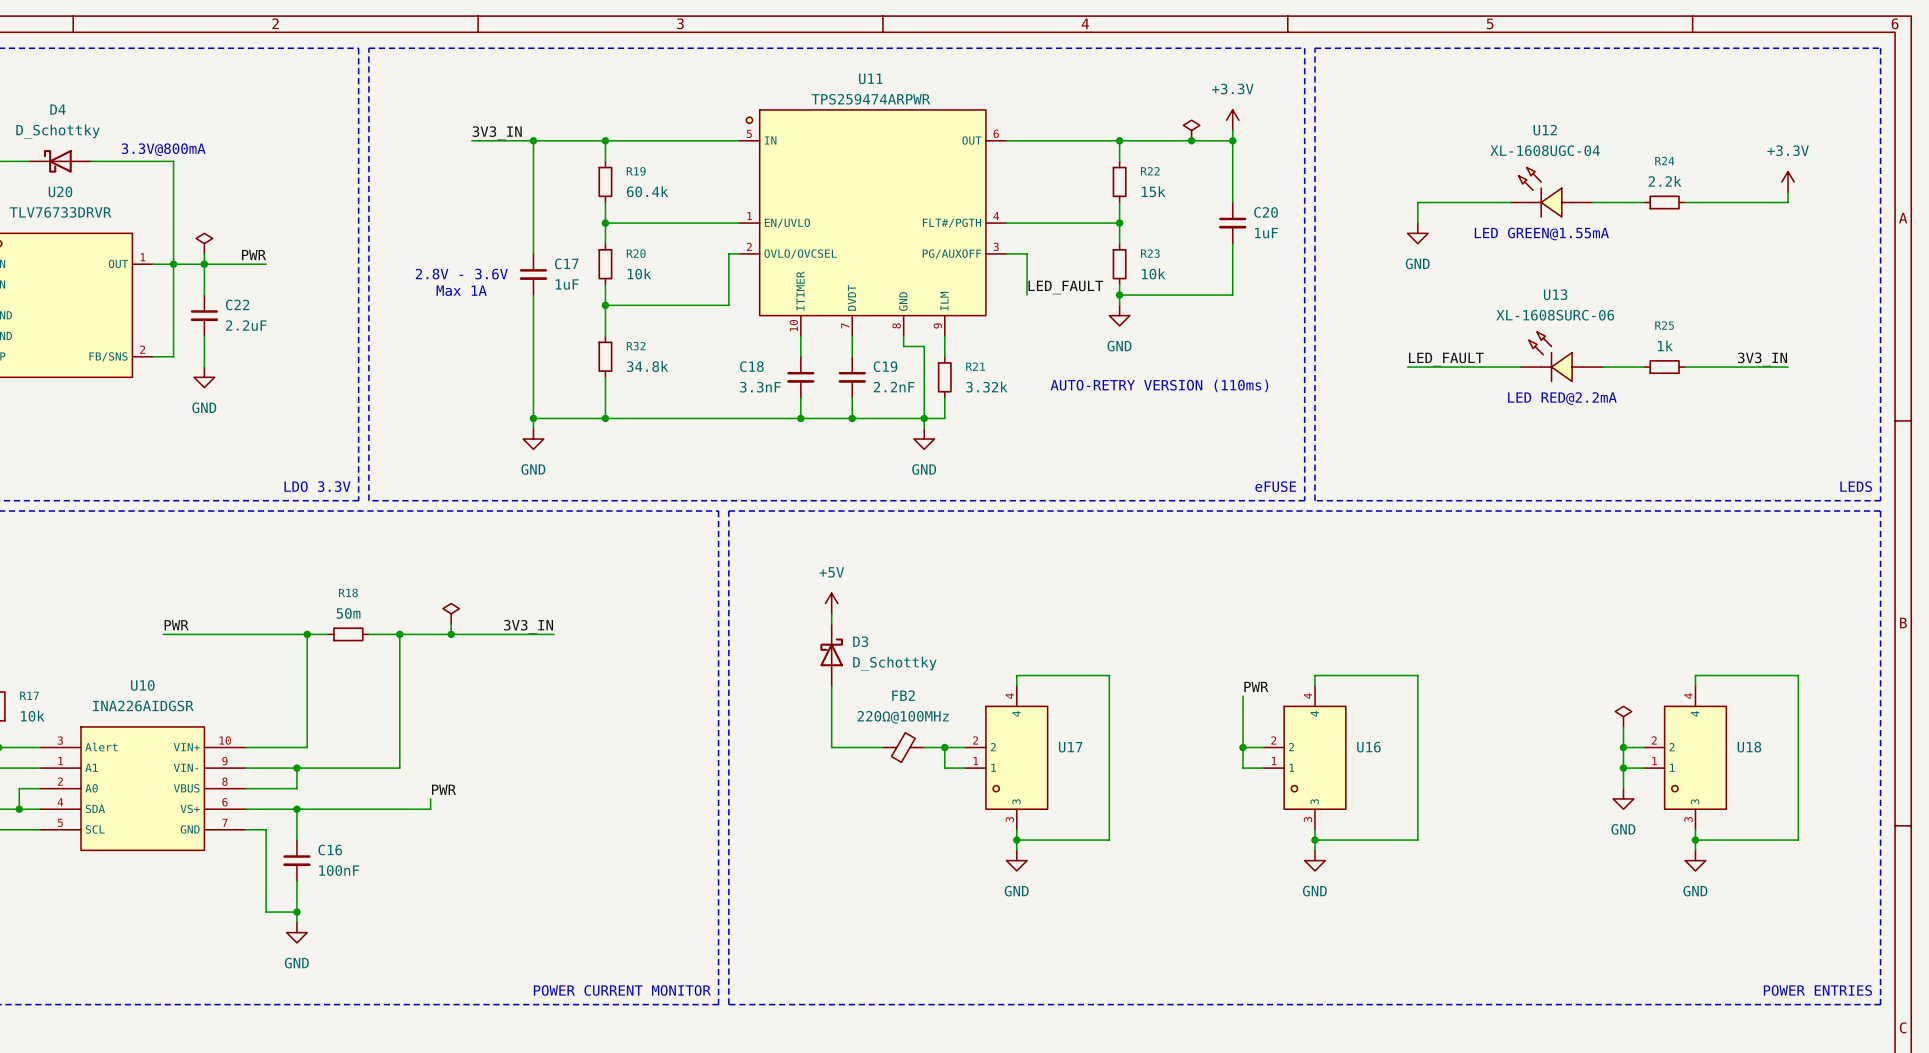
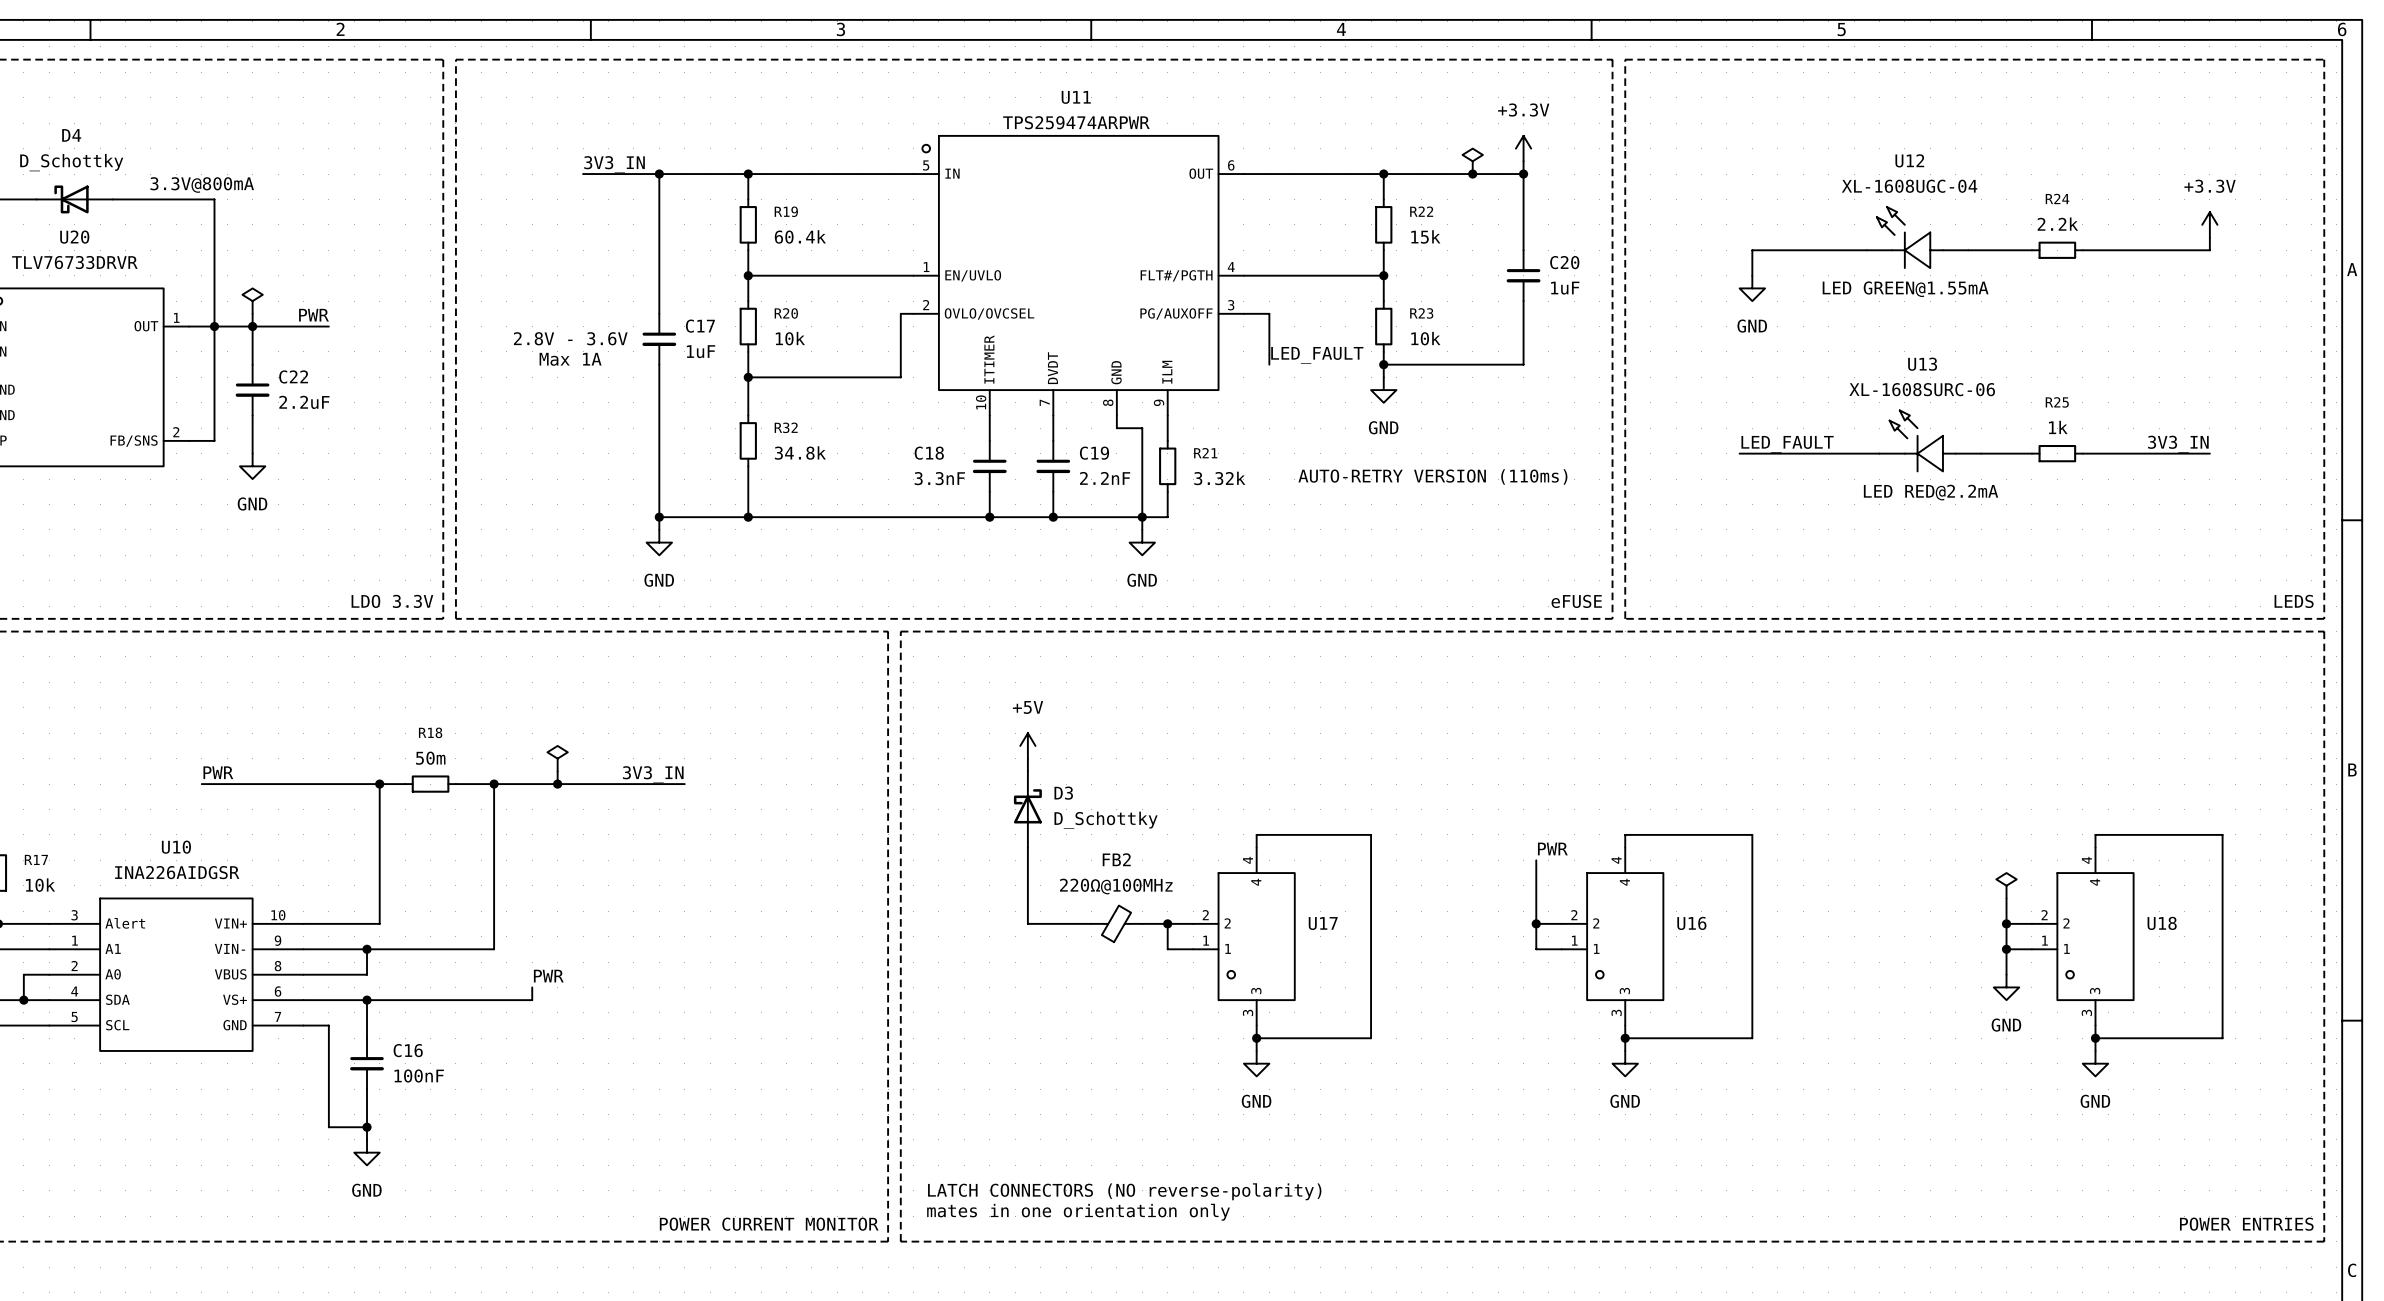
text: none -> LATCH CONNECTORS (NO reverse-polarity) (1124, 1191)
text: none -> mates in one orientation only (1078, 1212)

